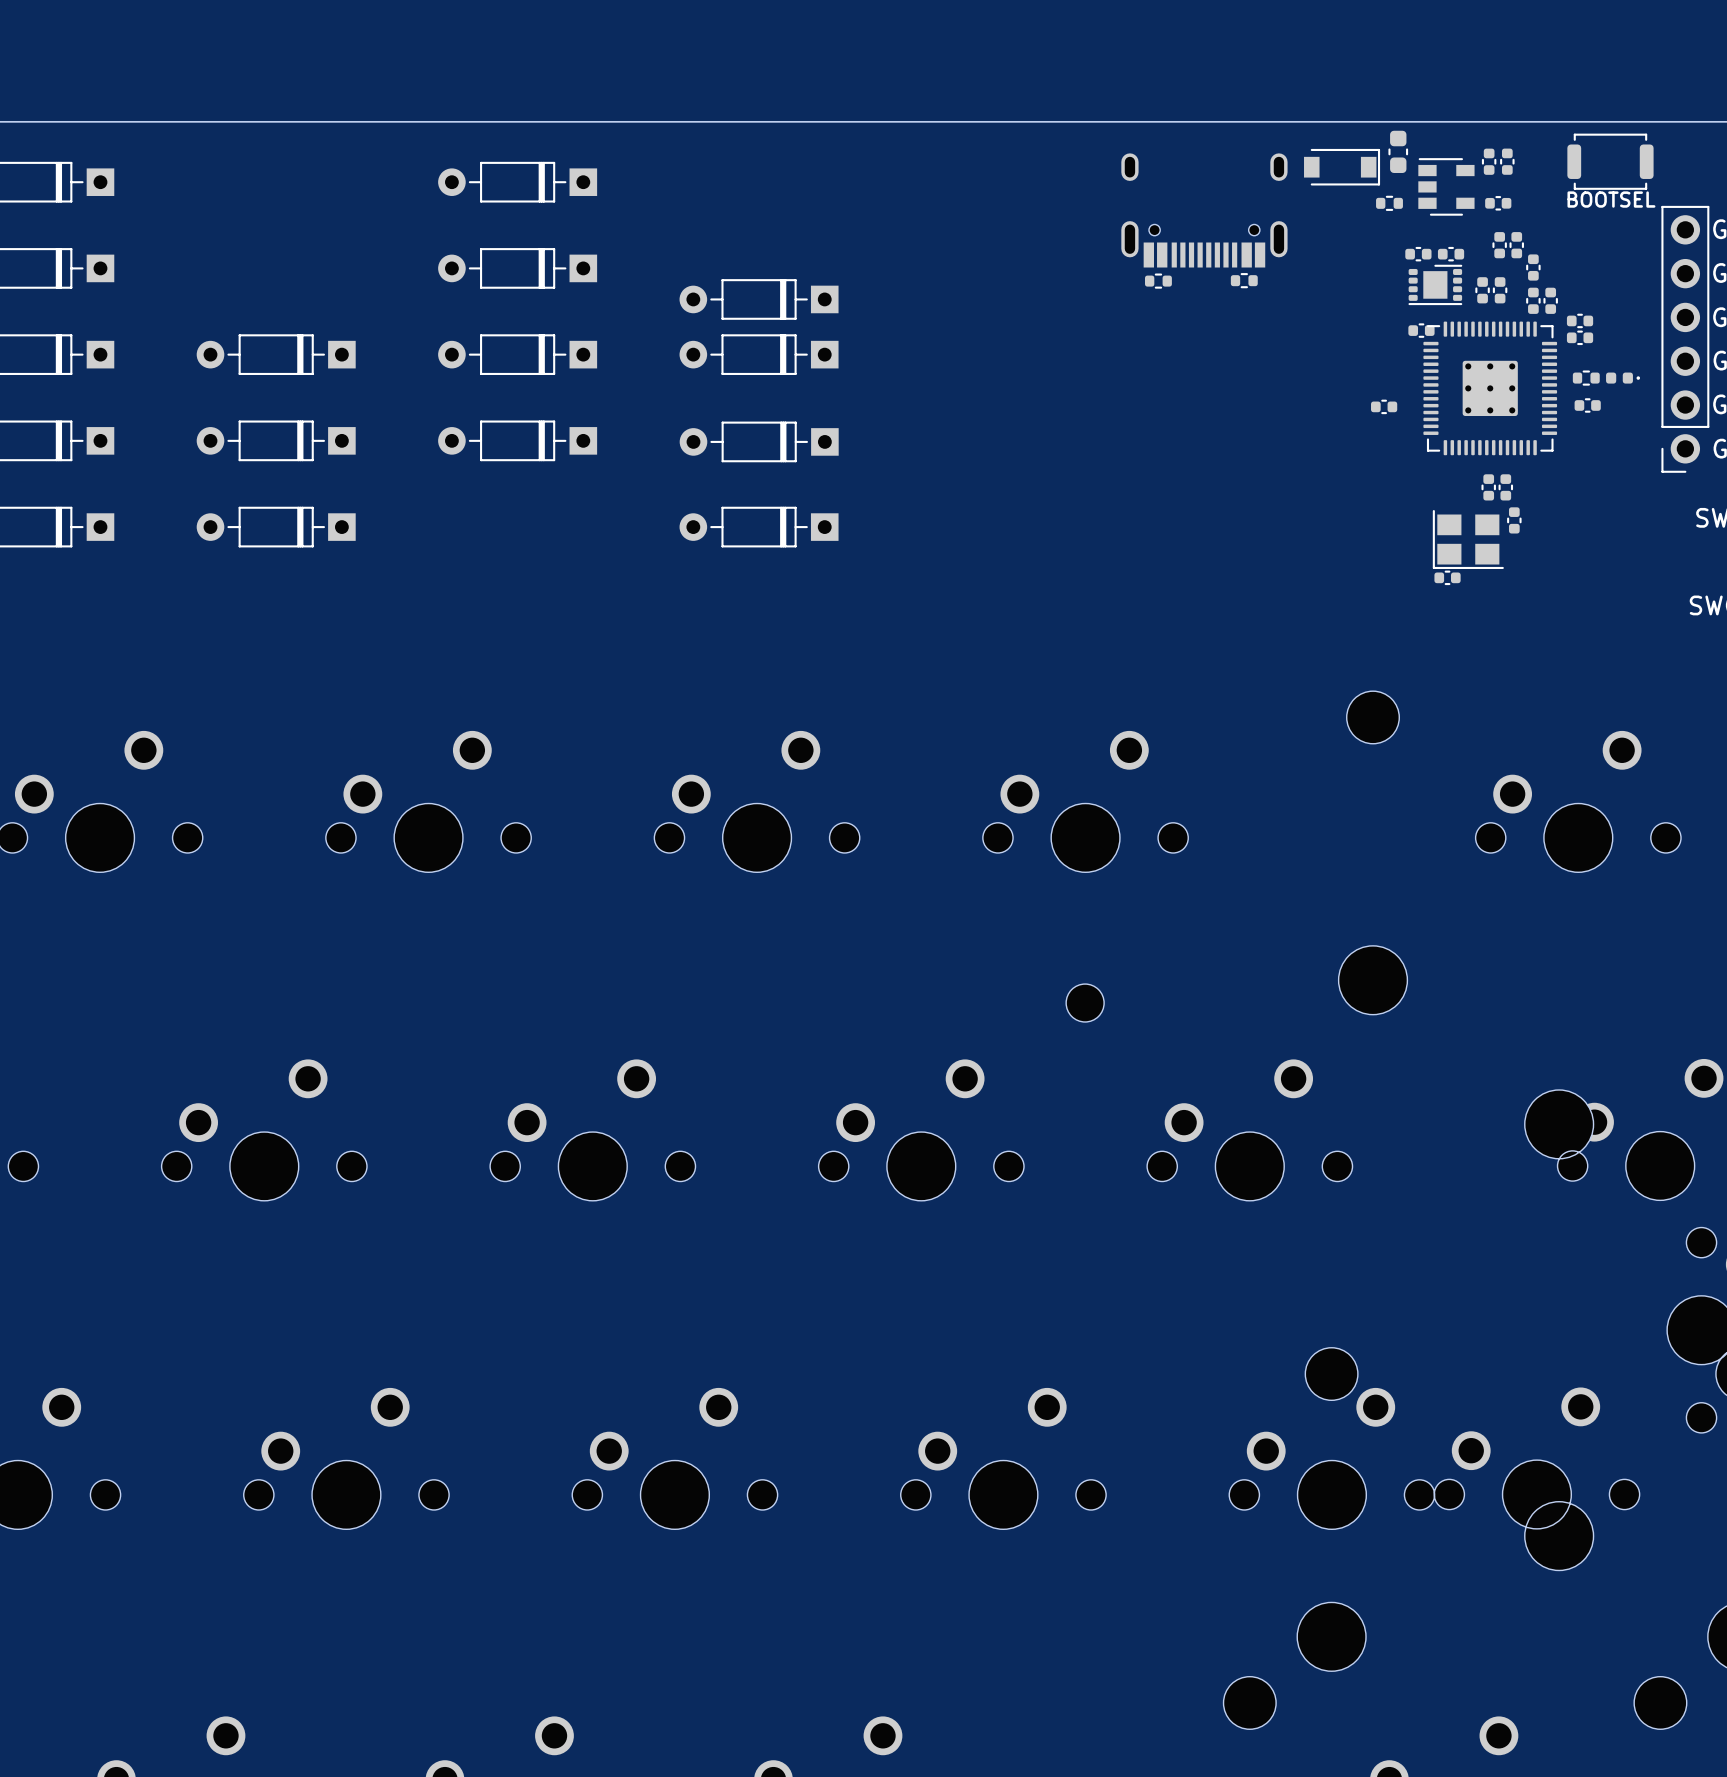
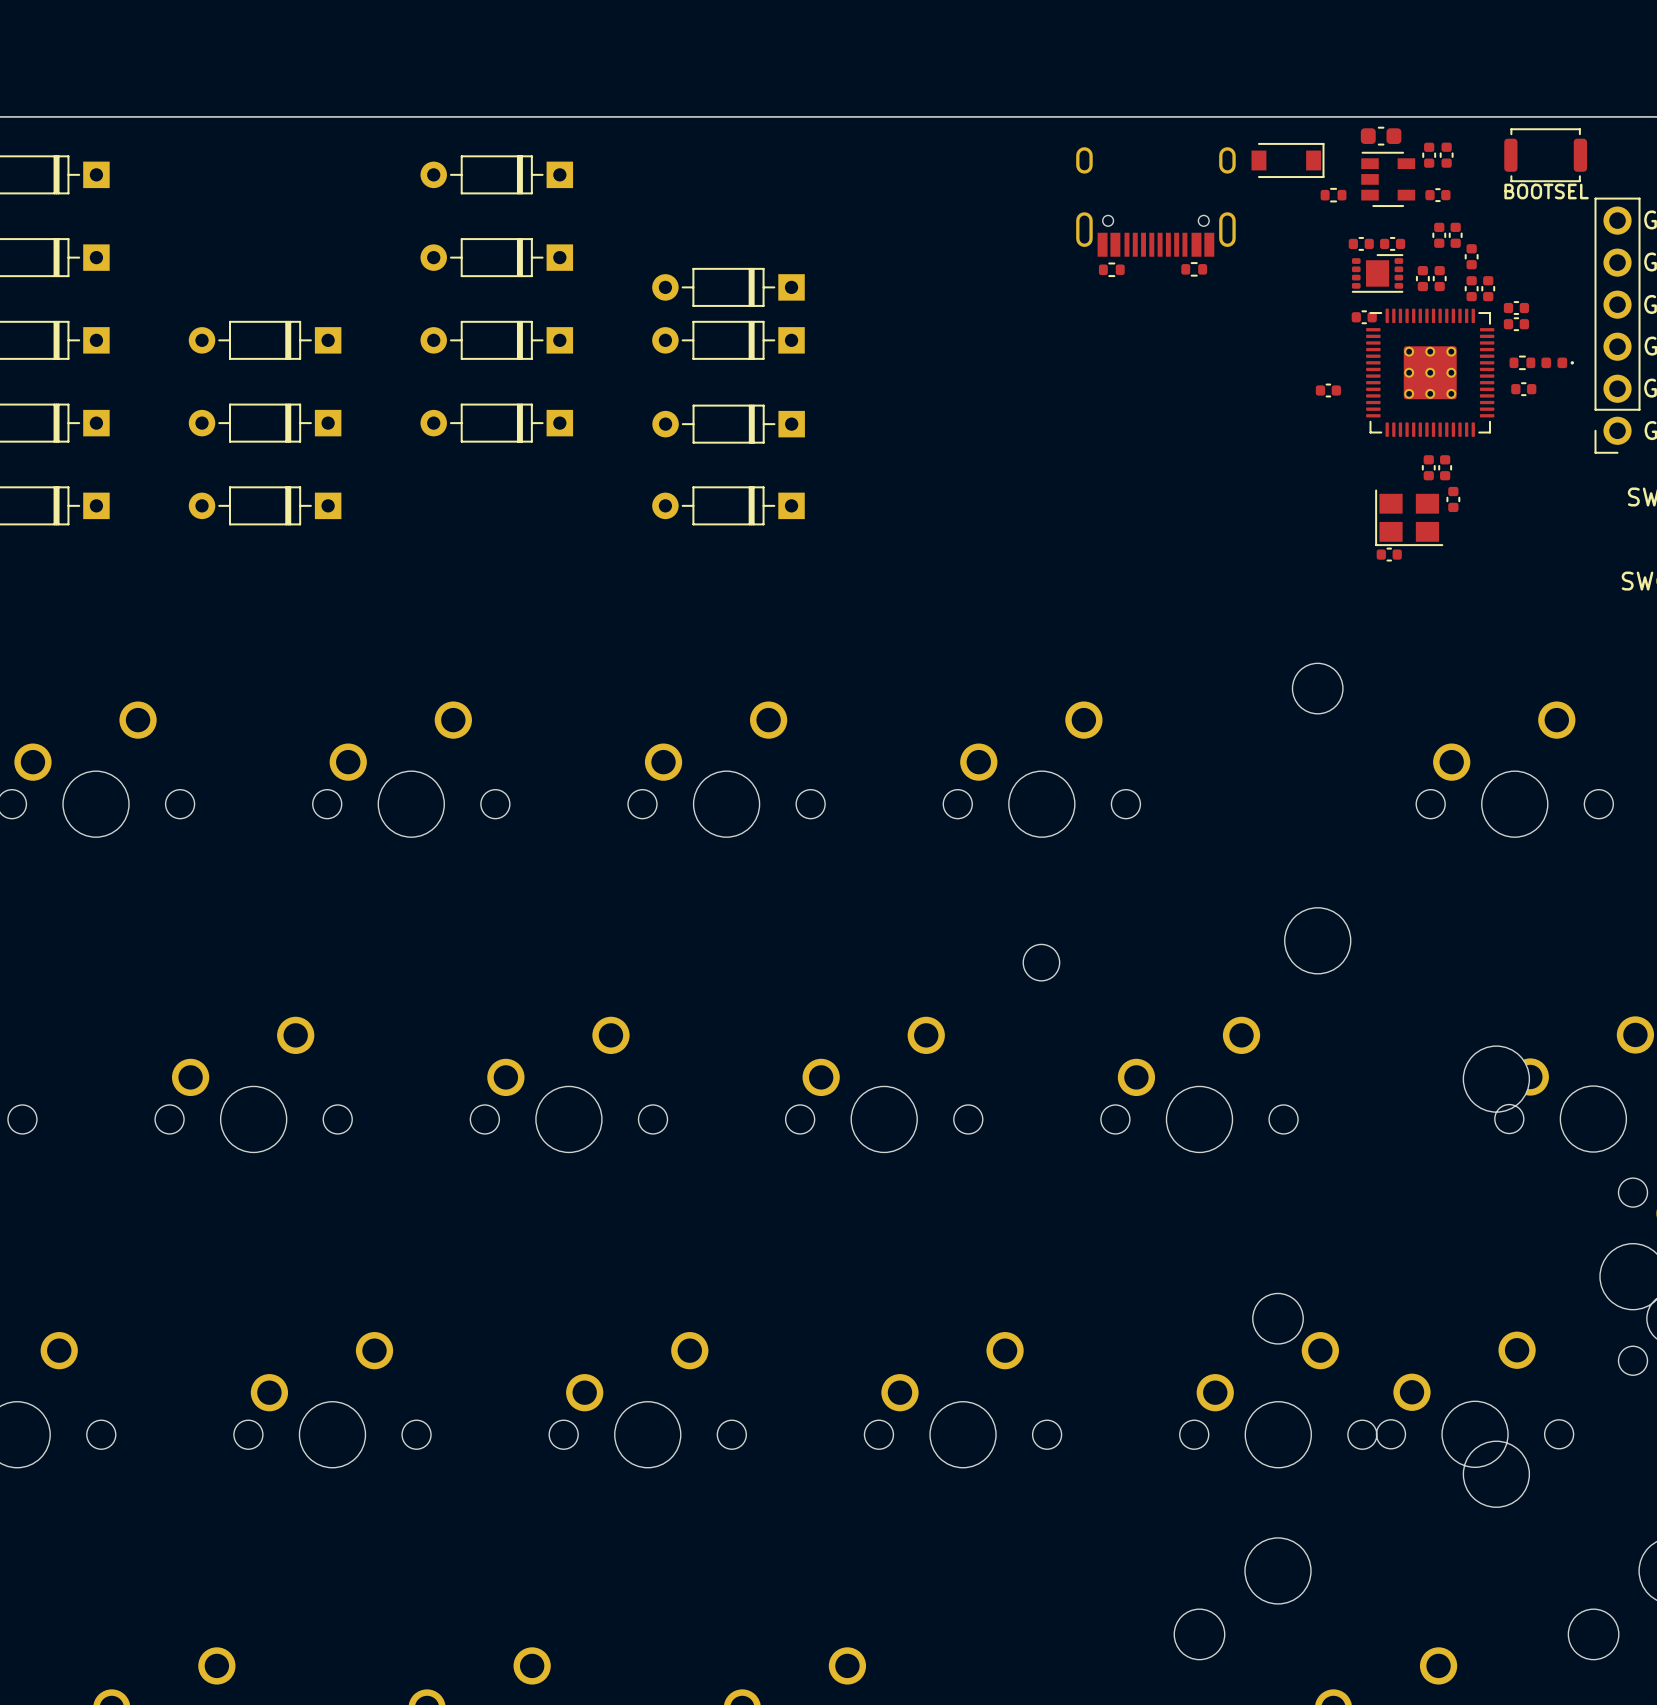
part rotation: 0° (1398, 151) -> 90° clockwise (1381, 136)
part position: (1398, 151) -> (1381, 136)

